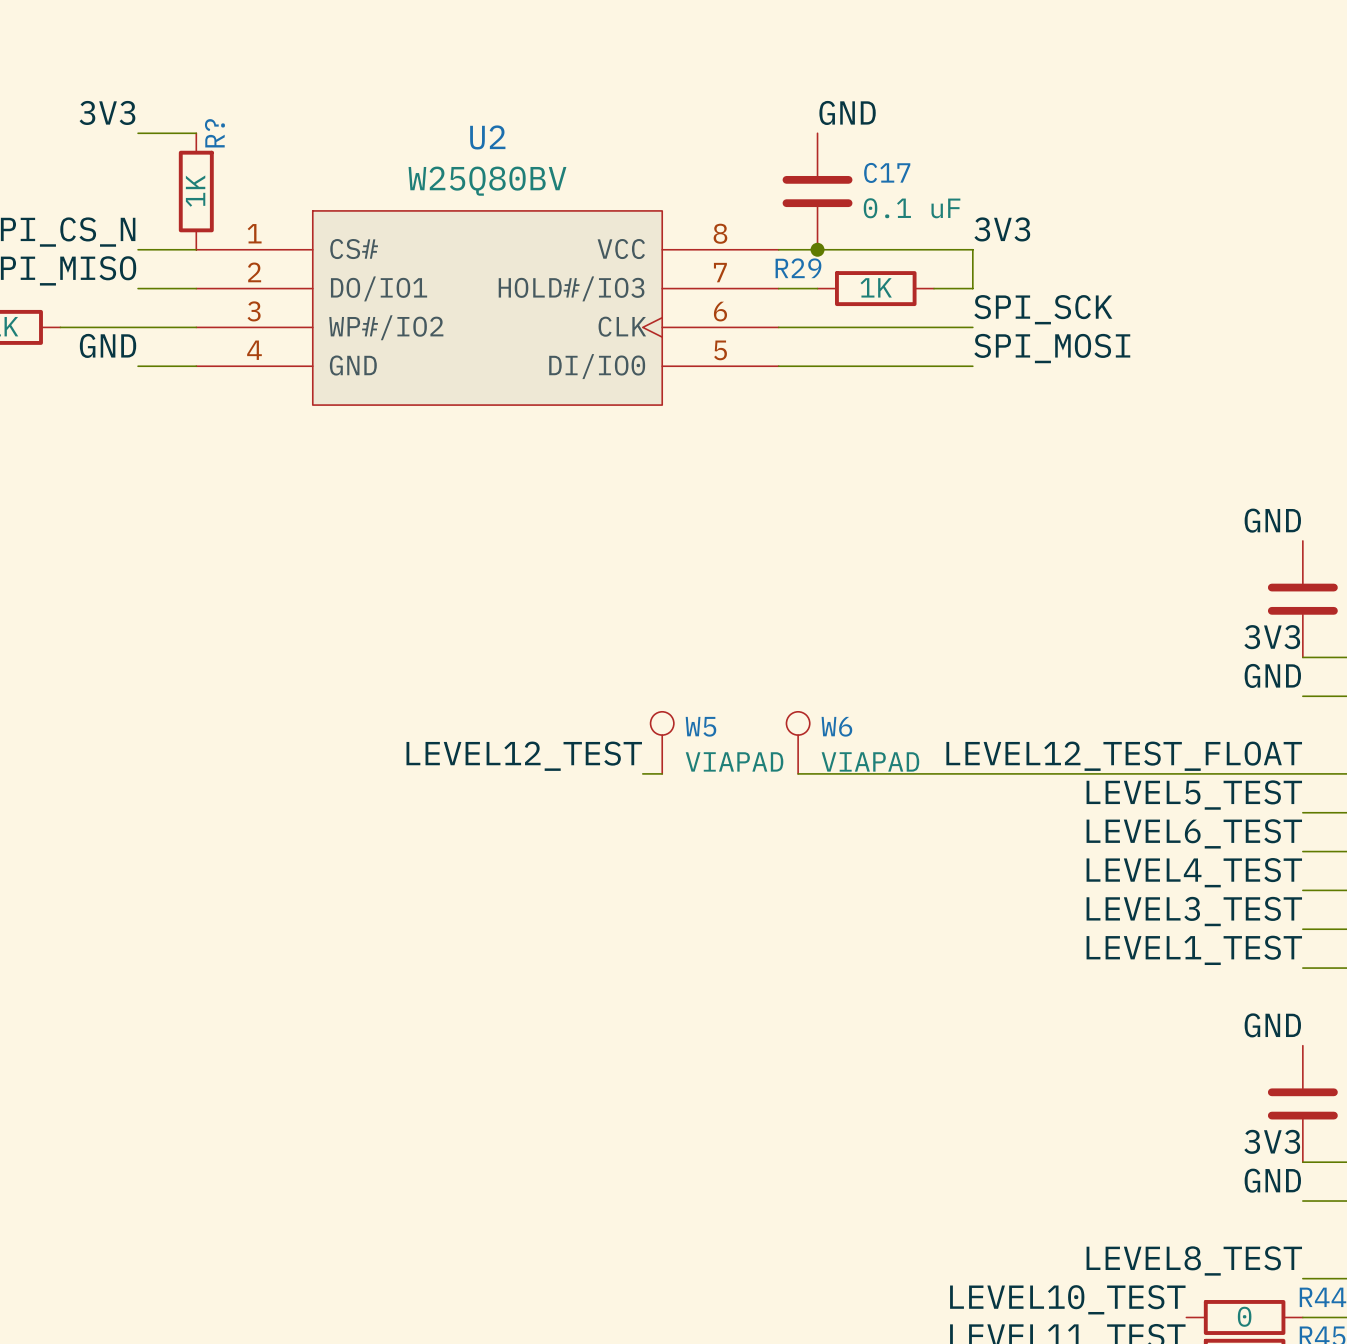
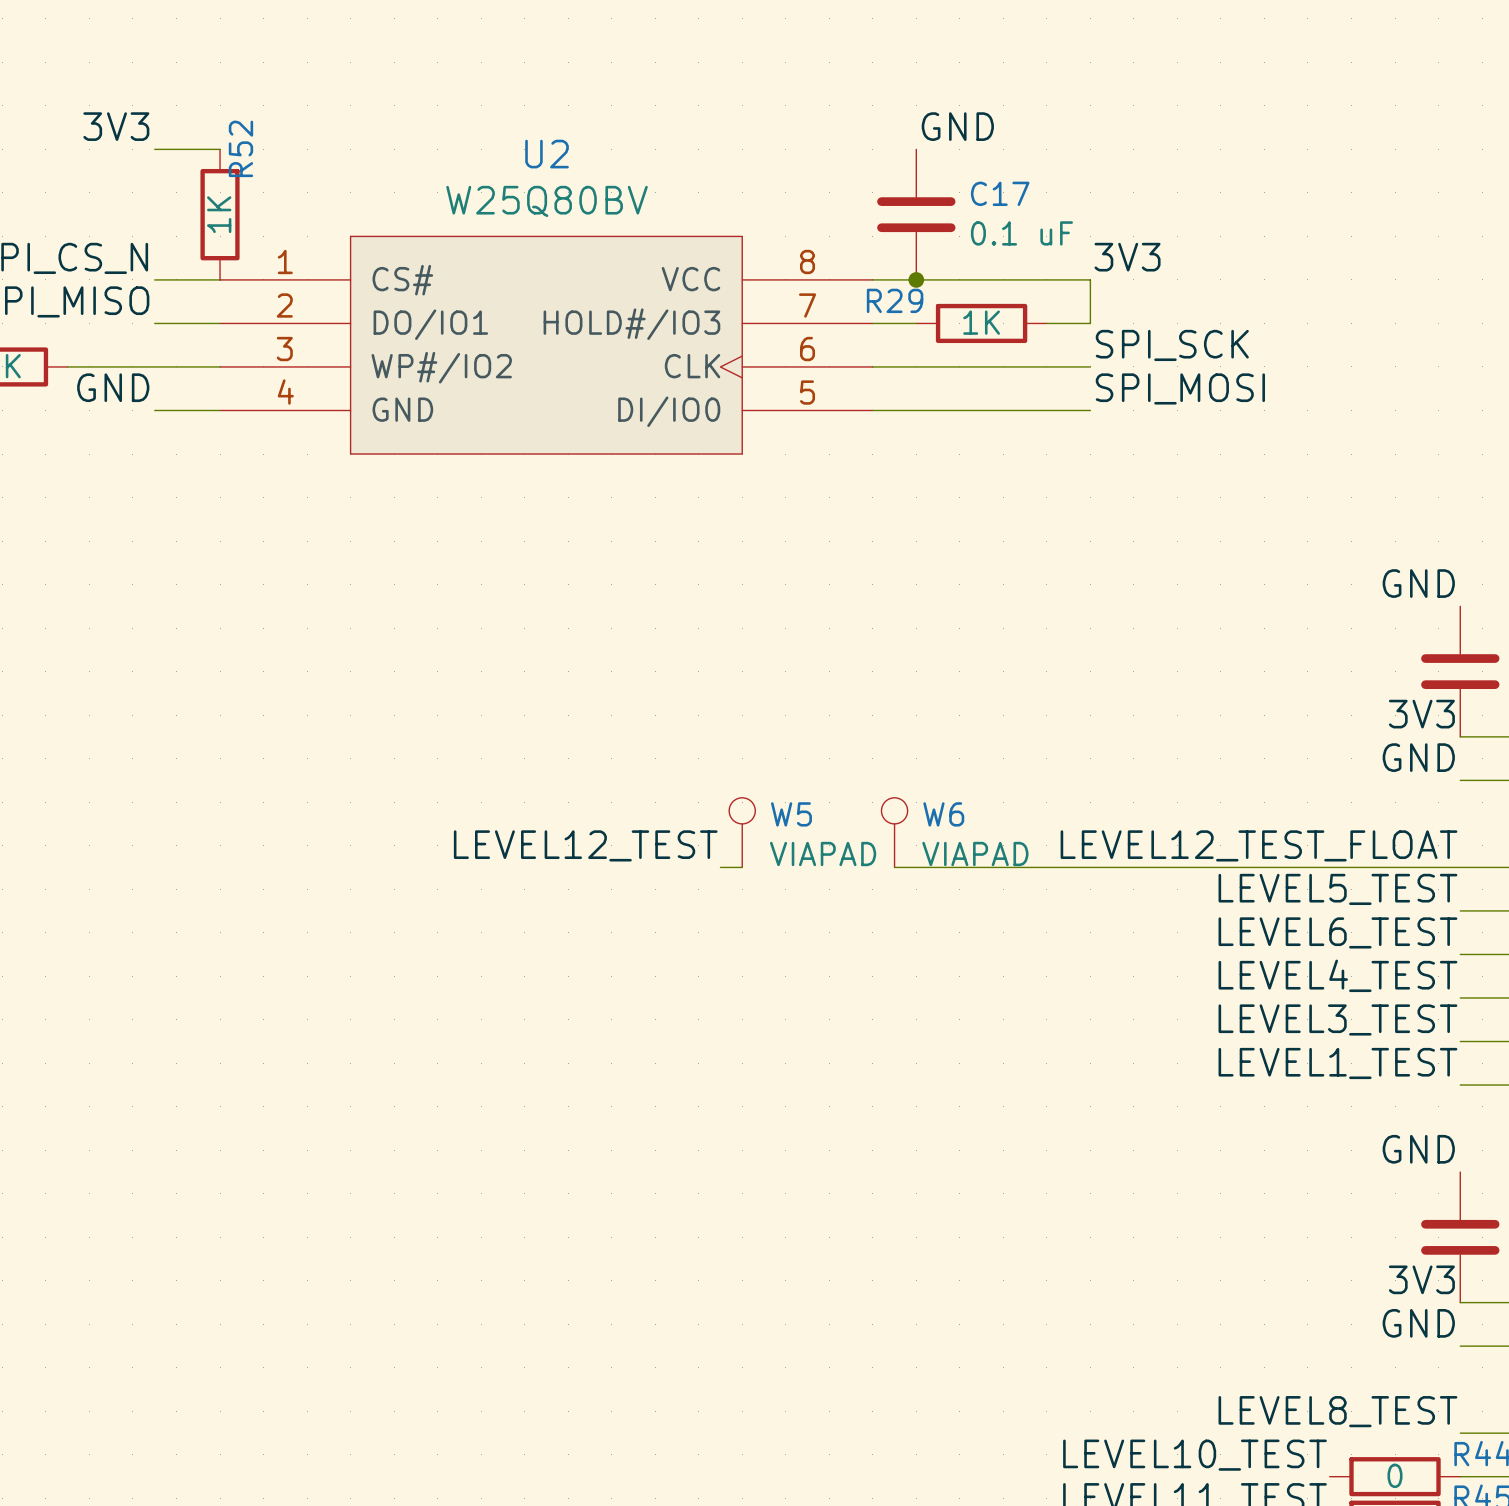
R? name: R? (214, 133) -> R52 (240, 148)

